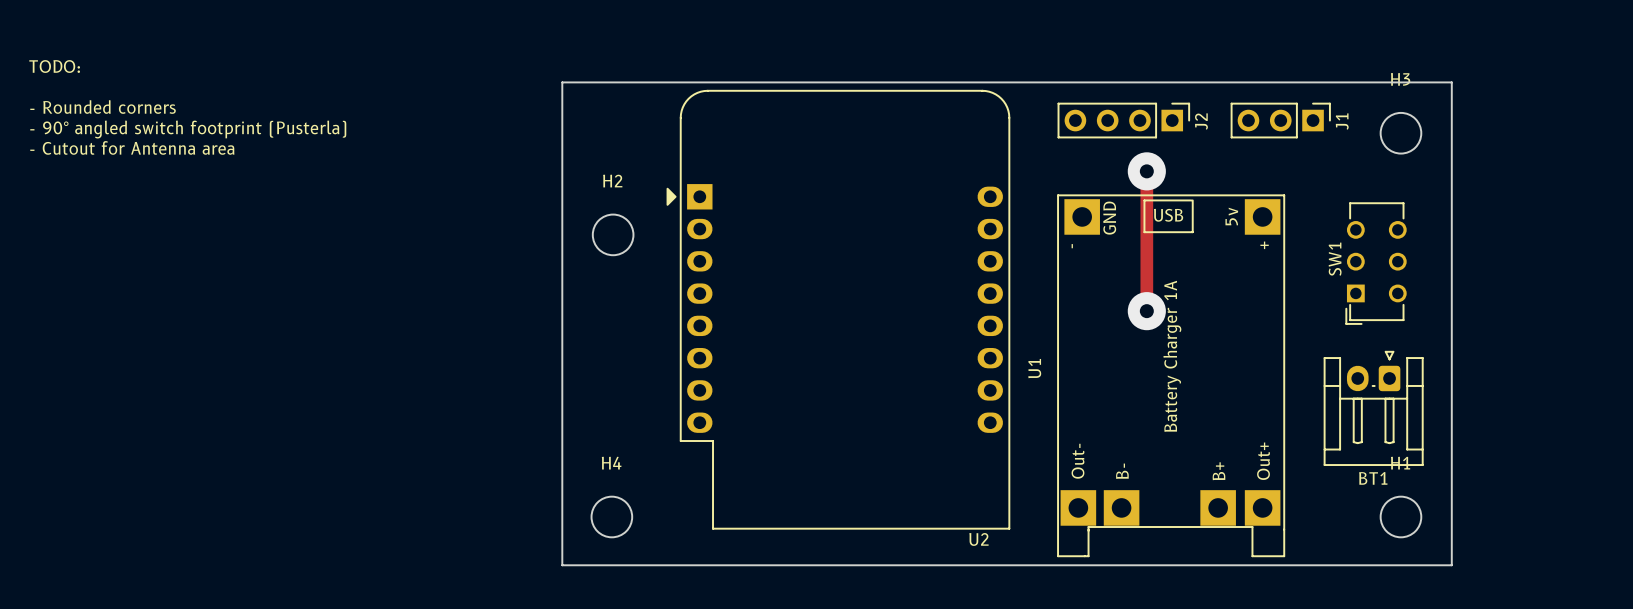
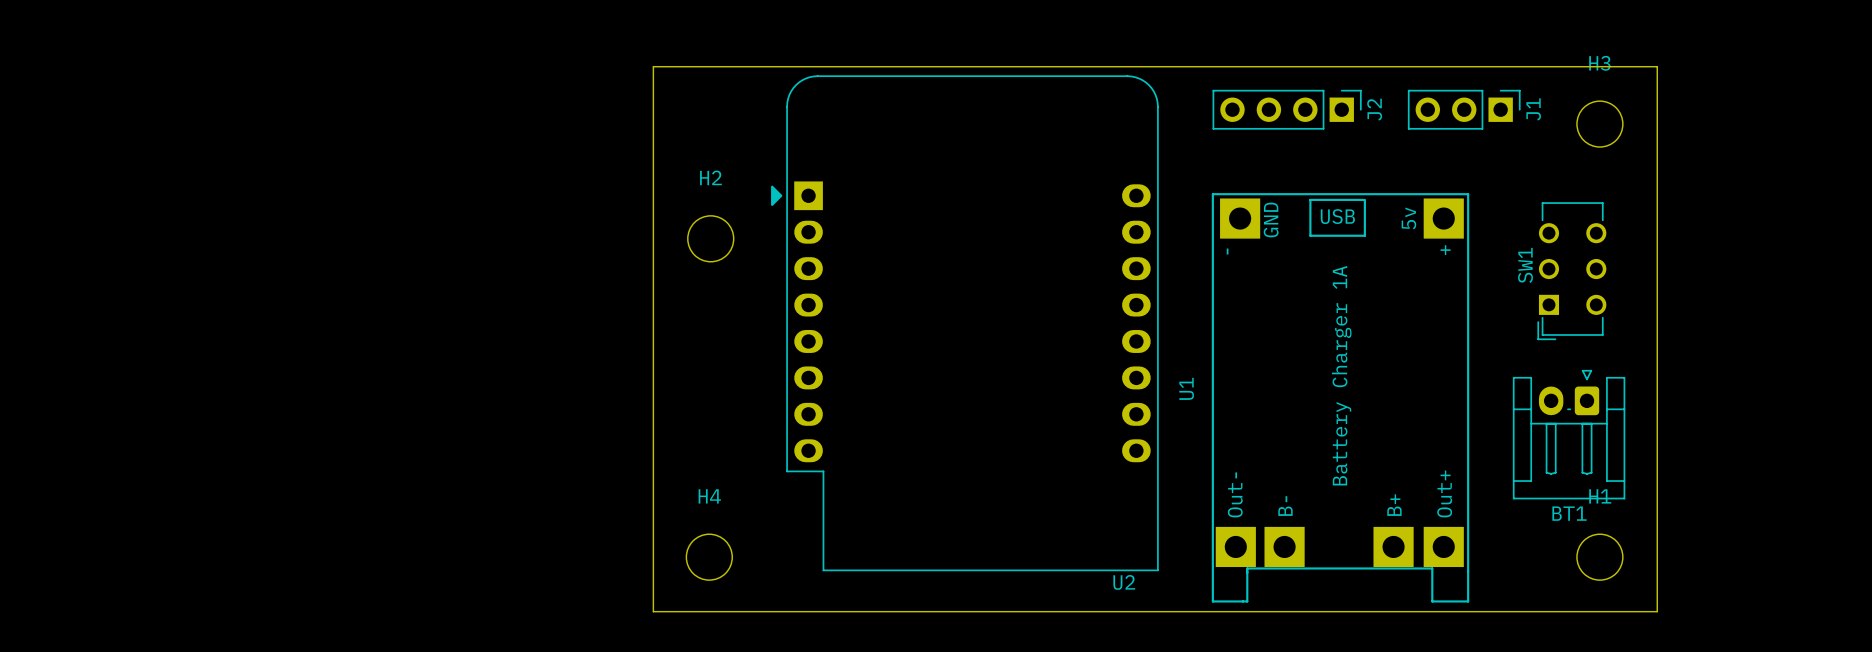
text: TODO: (54, 66) -> none
text: - Rounded corners (103, 107) -> none
text: - 90° angled switch footprint (Pusterla) (188, 129) -> none
text: - Cutout for Antenna area (132, 147) -> none
track: (1146, 171) (1146, 311) -> none
via: (1146, 171) -> none
via: (1146, 311) -> none

